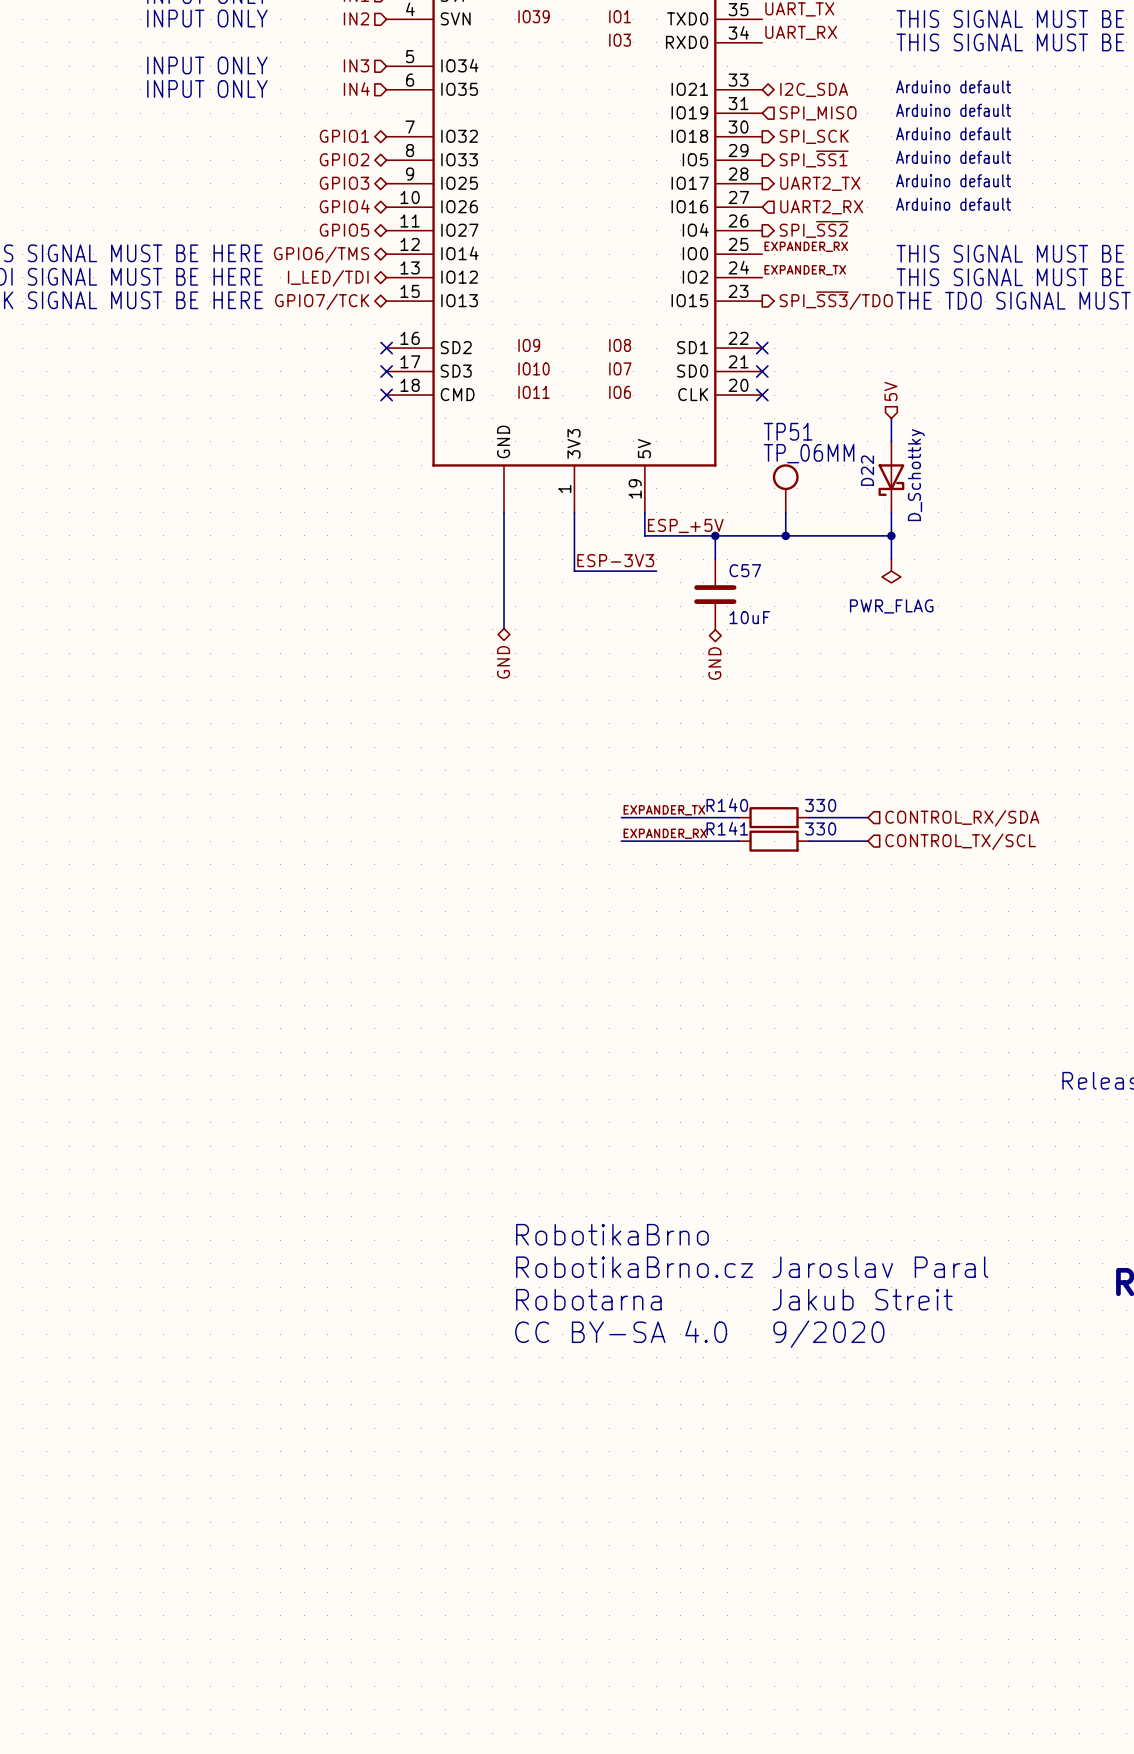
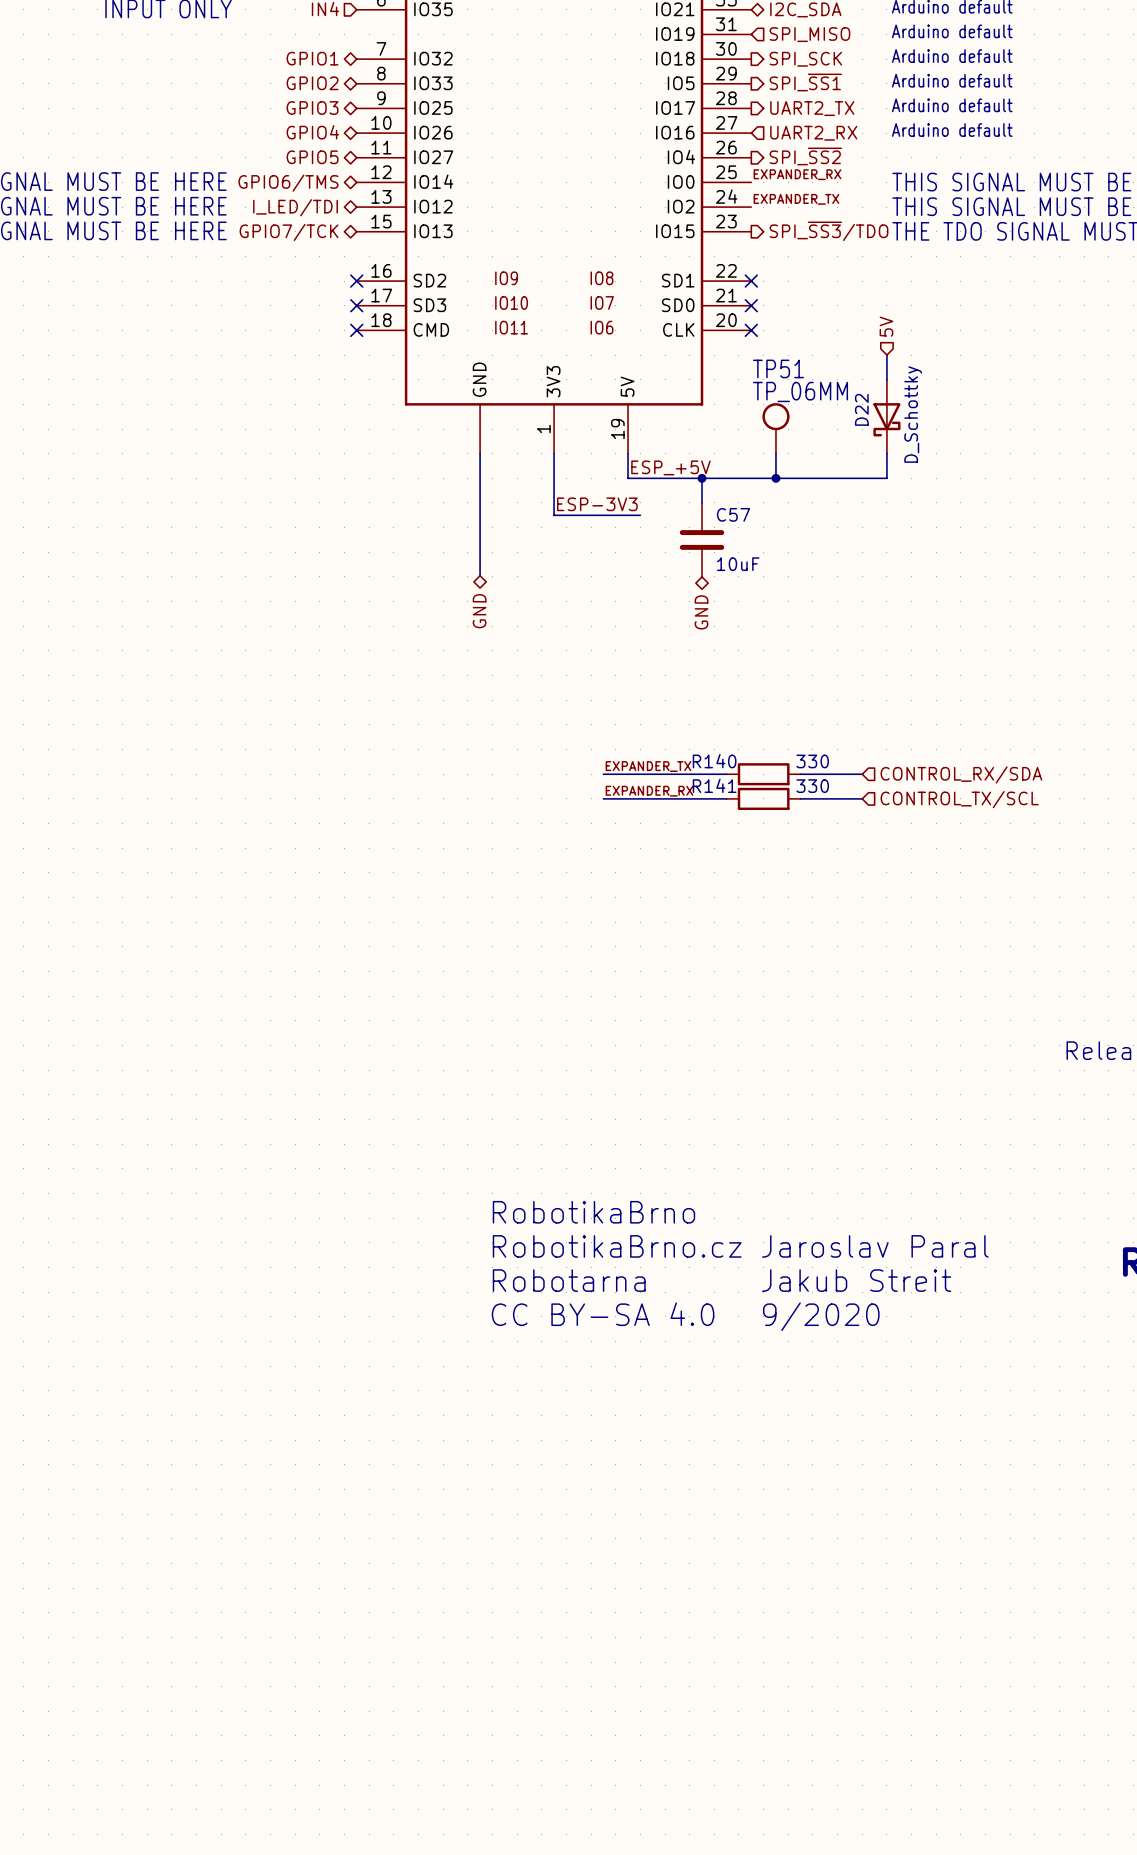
wire: (891, 535) (891, 559) -> none
junction: (891, 535) -> none
power symbol: PWR_FLAG (891, 571) -> none

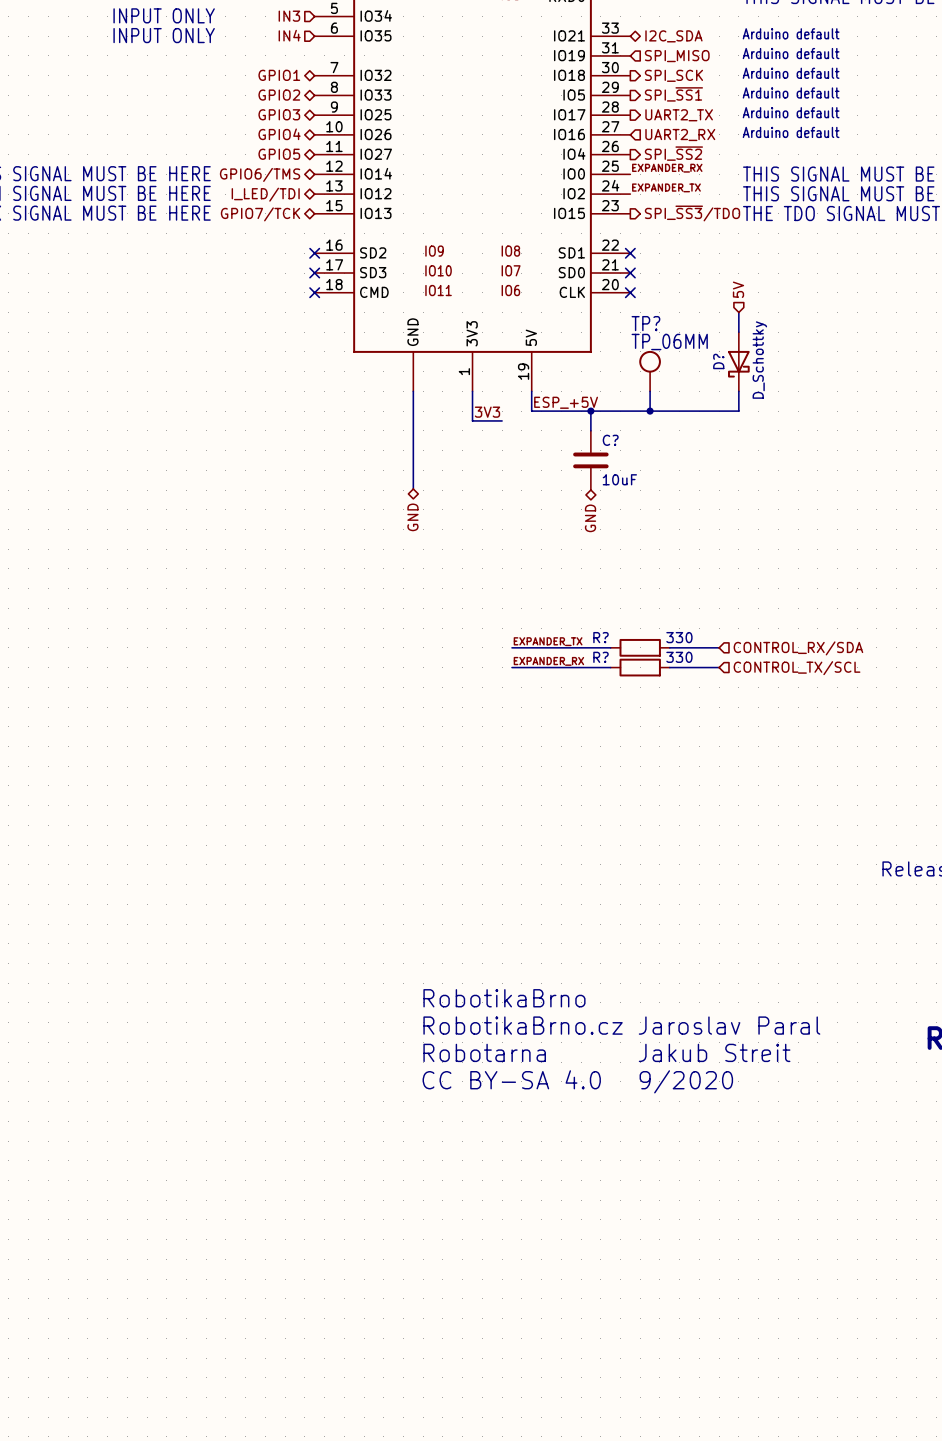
TP51 name: TP51 (778, 368) -> TP? (645, 323)
D22 name: D22 (861, 409) -> D? (718, 361)
label: none -> 3V3 (487, 412)
wire: (554, 490) (554, 515) (640, 515) -> (472, 420) (502, 420)
label: ESP-3V3 (597, 504) -> none
C57 name: C57 (733, 514) -> C? (610, 440)
R140 name: R140 (714, 761) -> R? (600, 637)
R141 name: R141 (714, 785) -> R? (600, 657)

